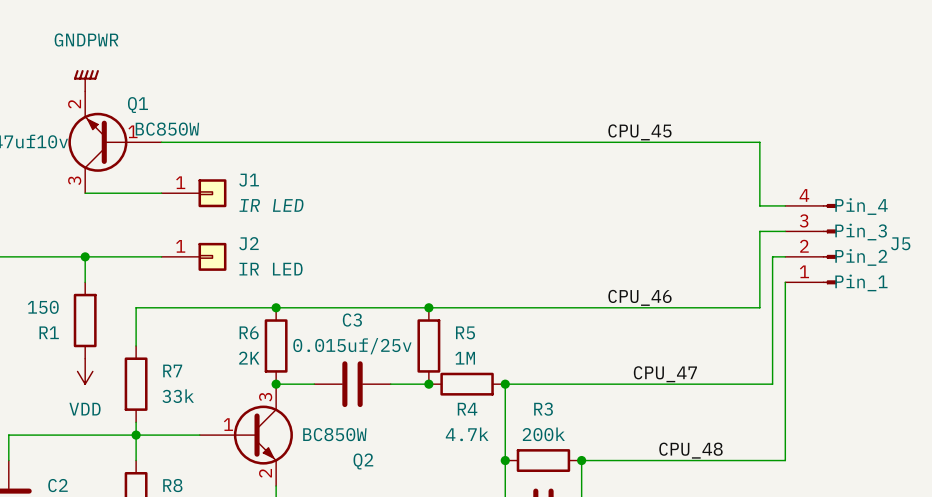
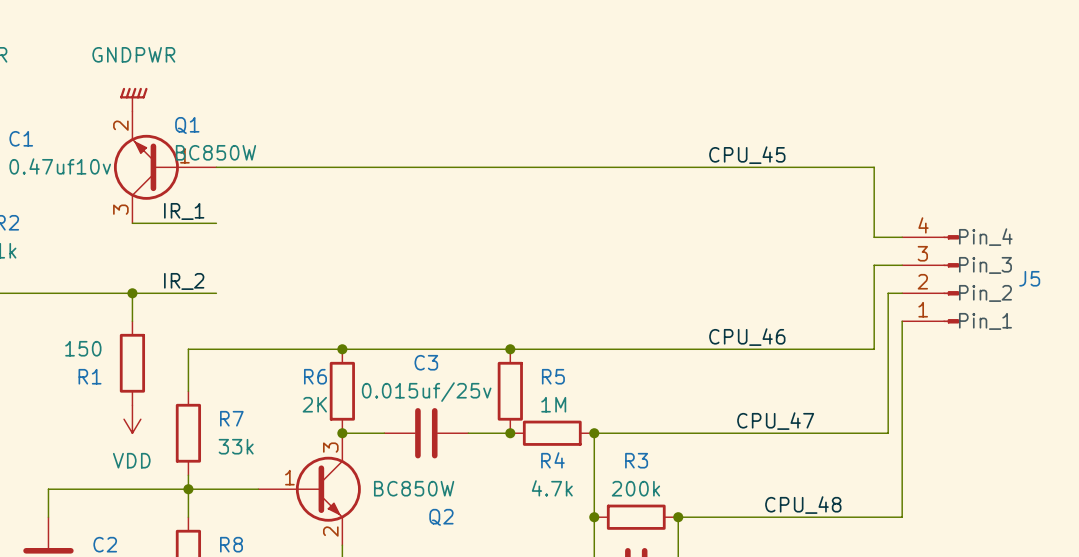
label: none -> IR_1 (184, 211)
J1: IR LED (194, 193) -> none
label: none -> IR_2 (184, 281)
J2: IR LED (194, 256) -> none

